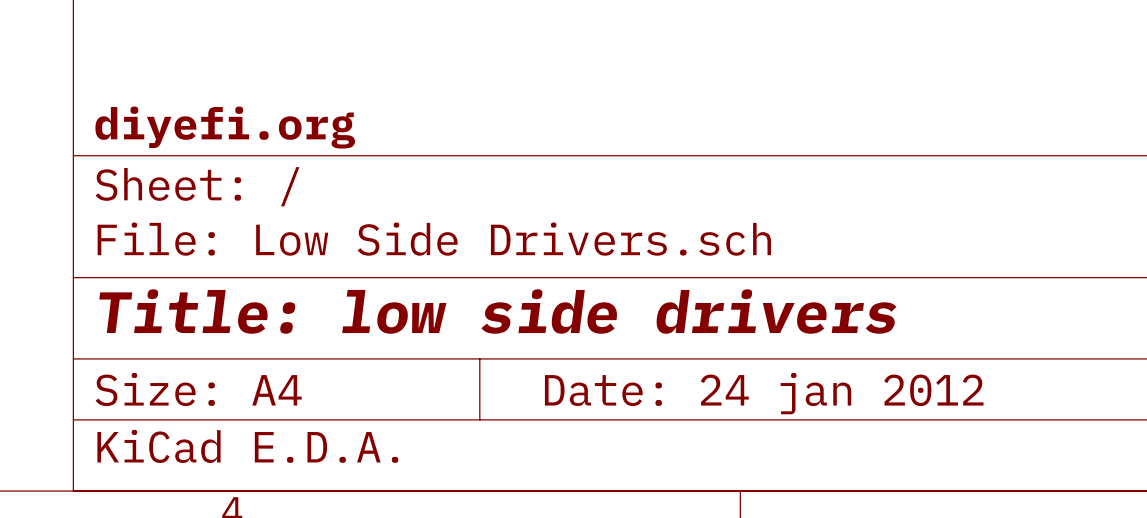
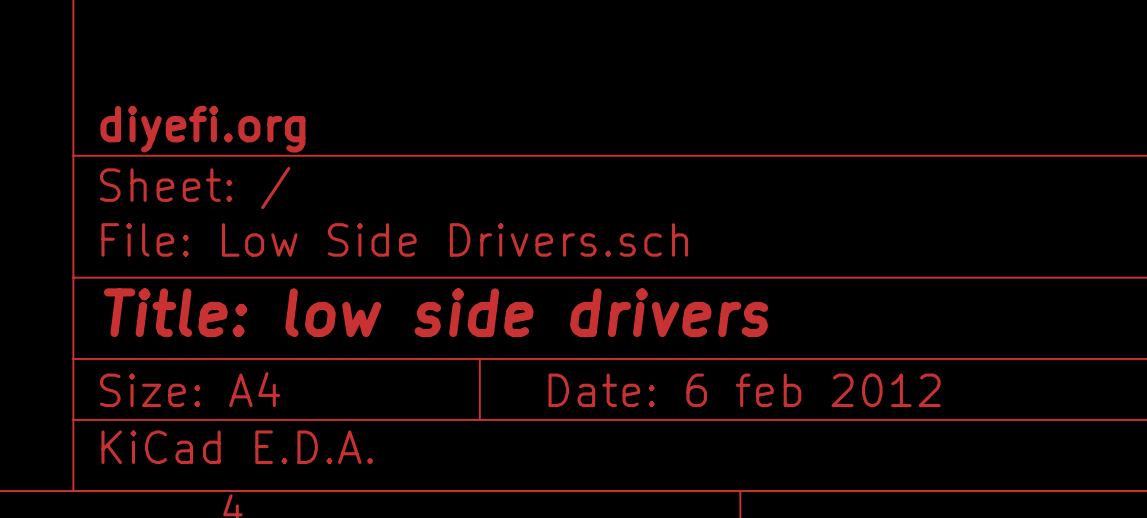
title block: Date: 24 jan 2012 (764, 393) -> Date: 6 feb 2012 (744, 390)

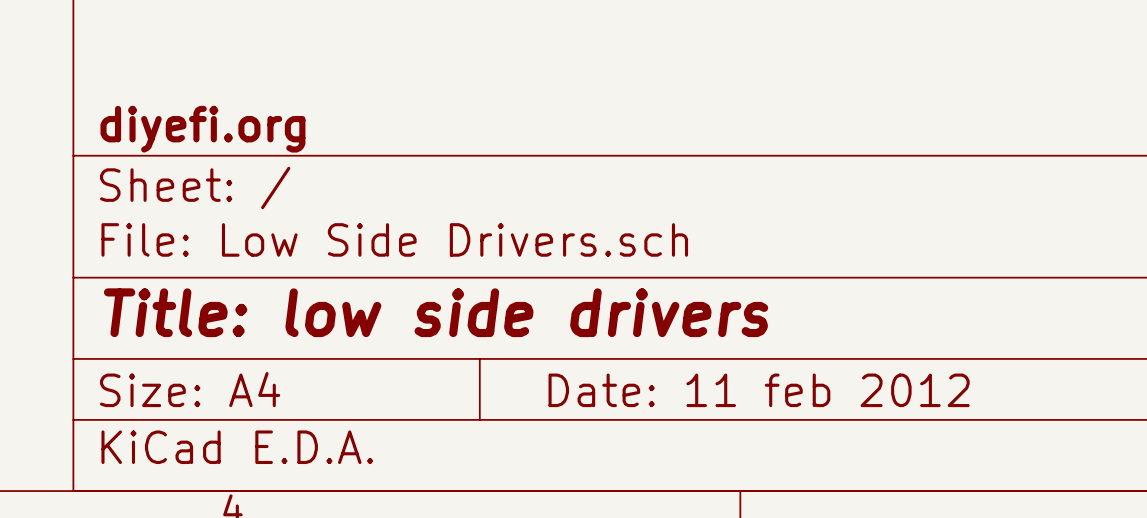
title block: Date: 6 feb 2012 (744, 390) -> Date: 11 feb 2012 (759, 390)

